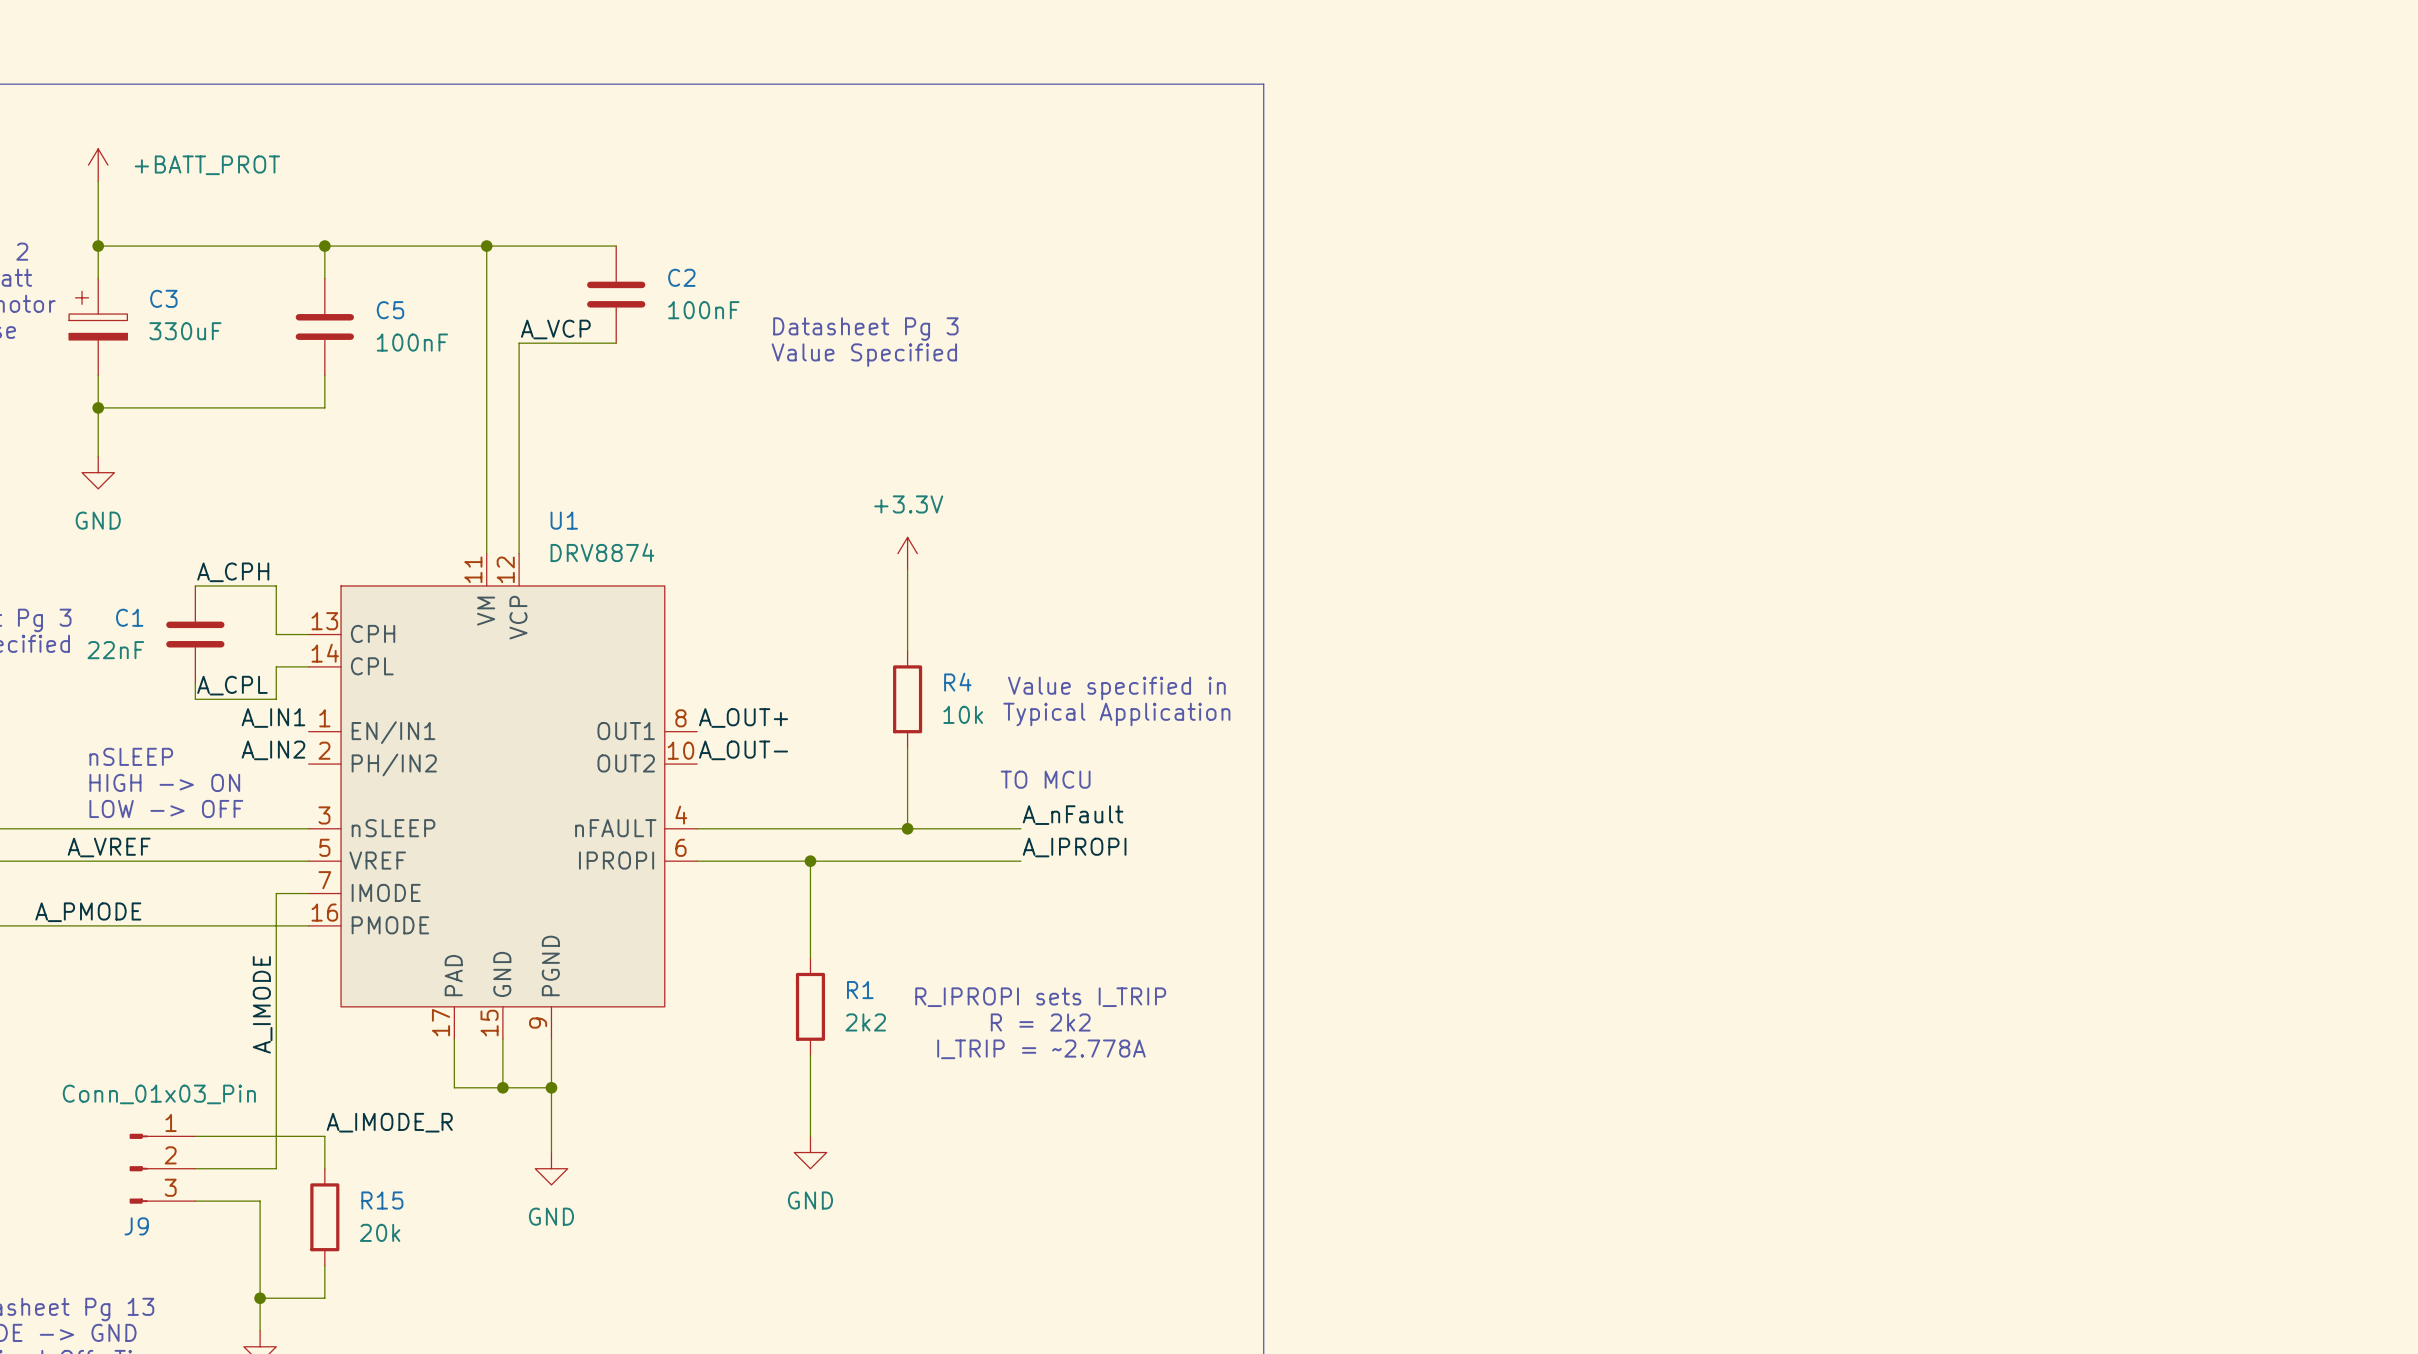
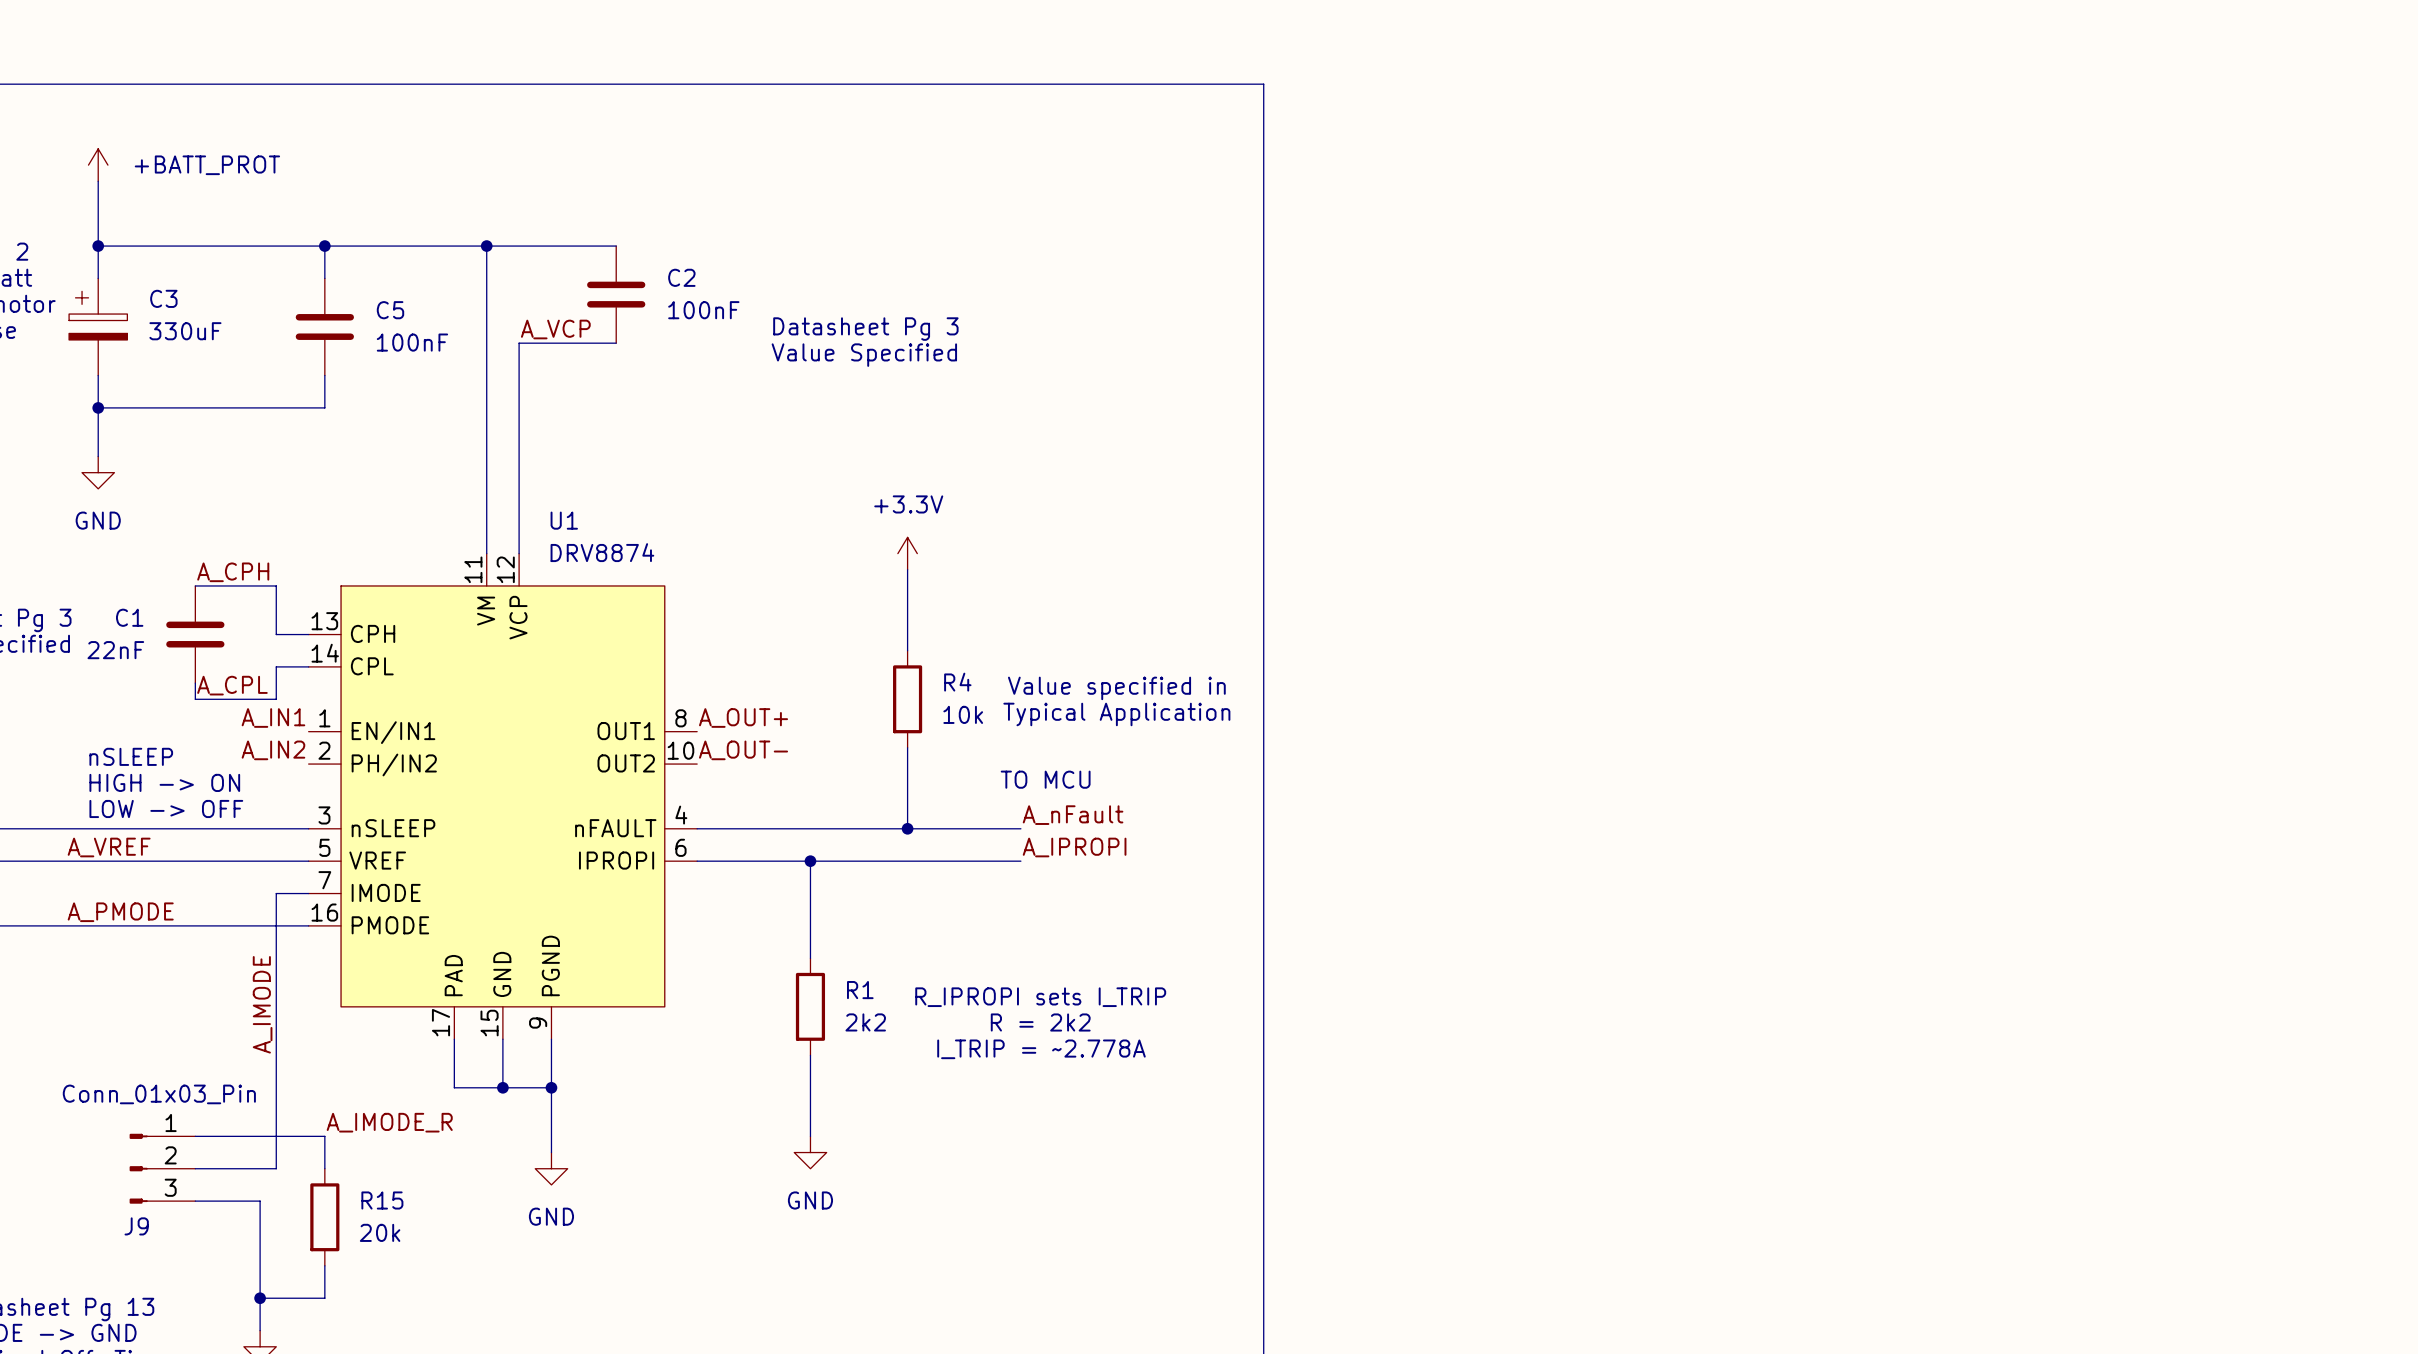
label position: A_PMODE (88, 912) -> A_PMODE (120, 912)

